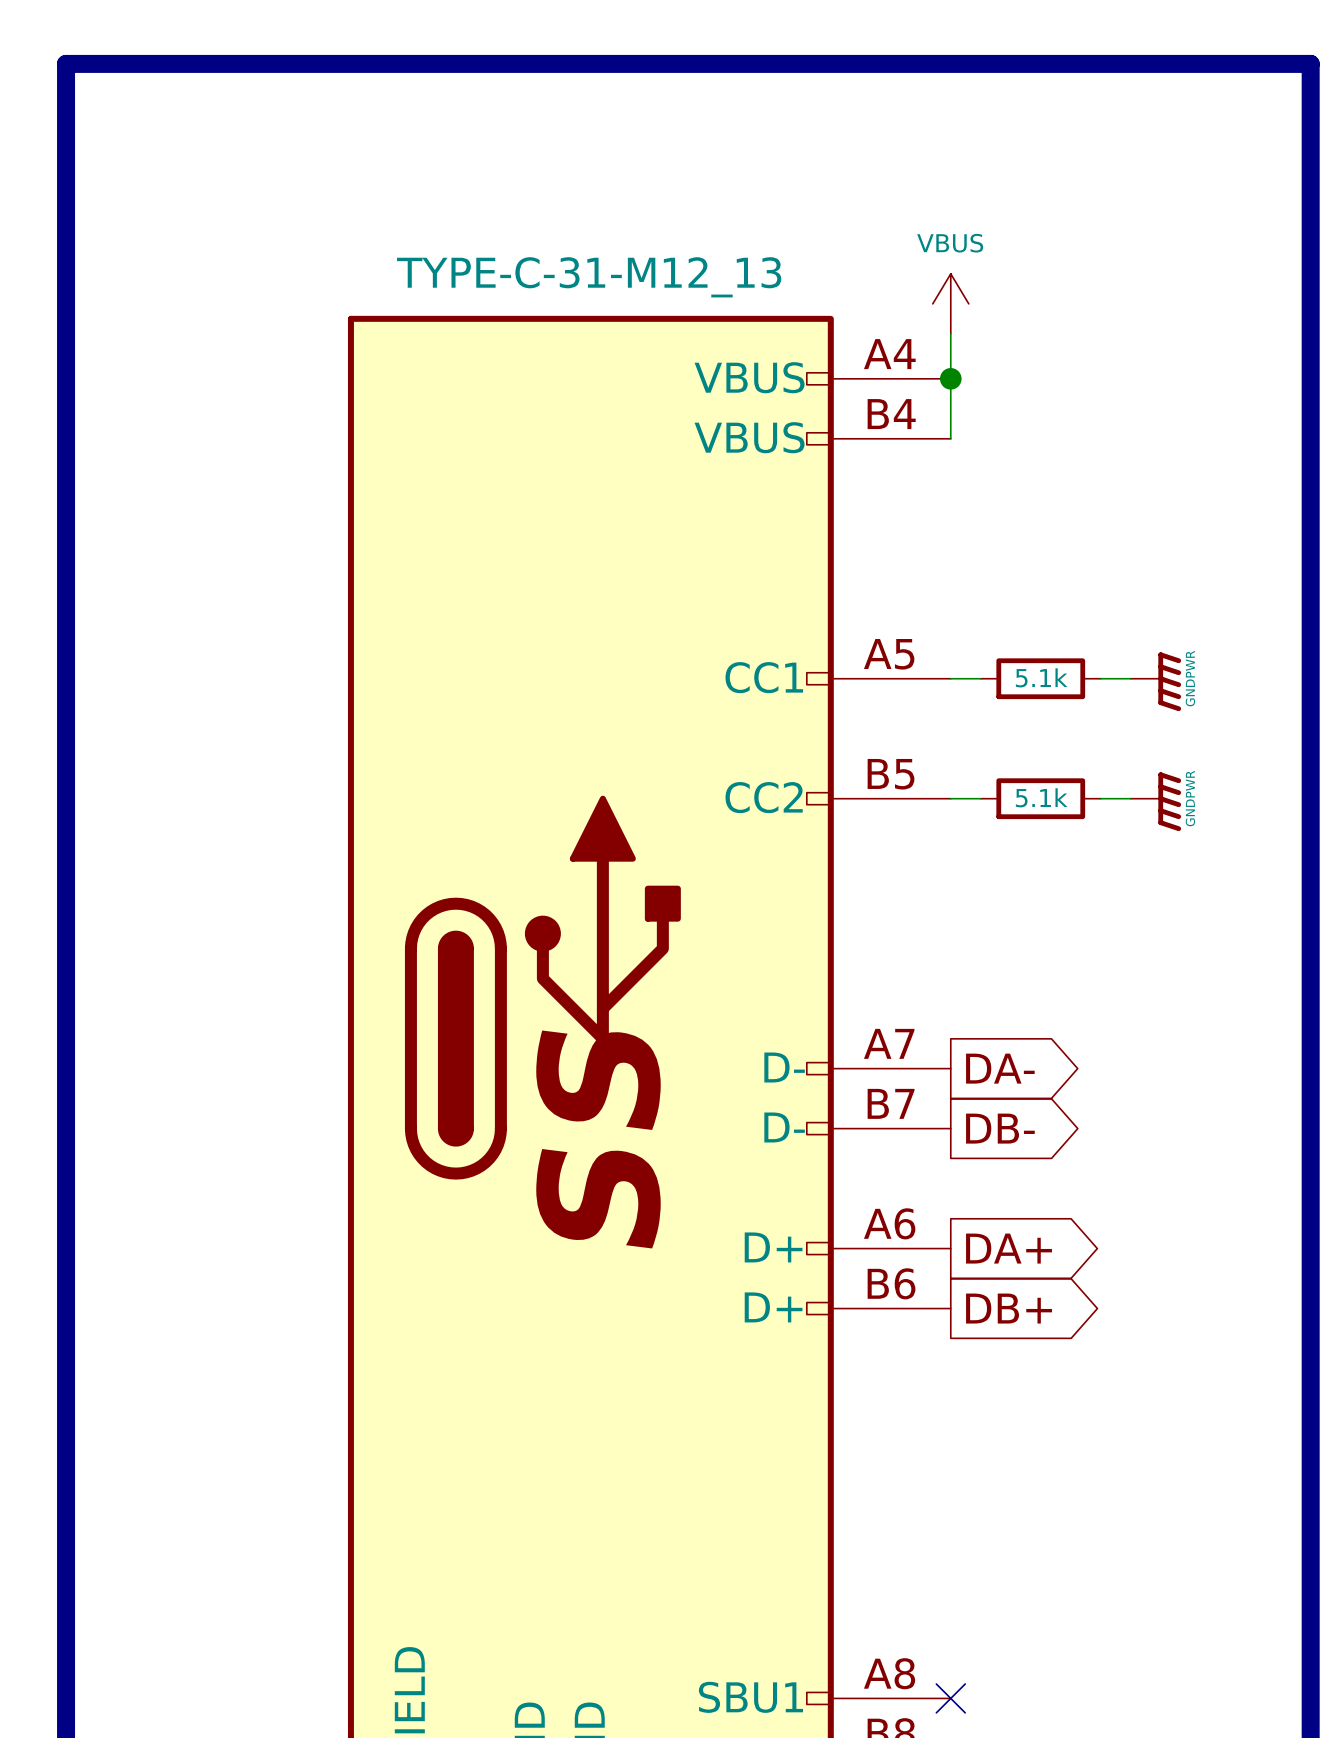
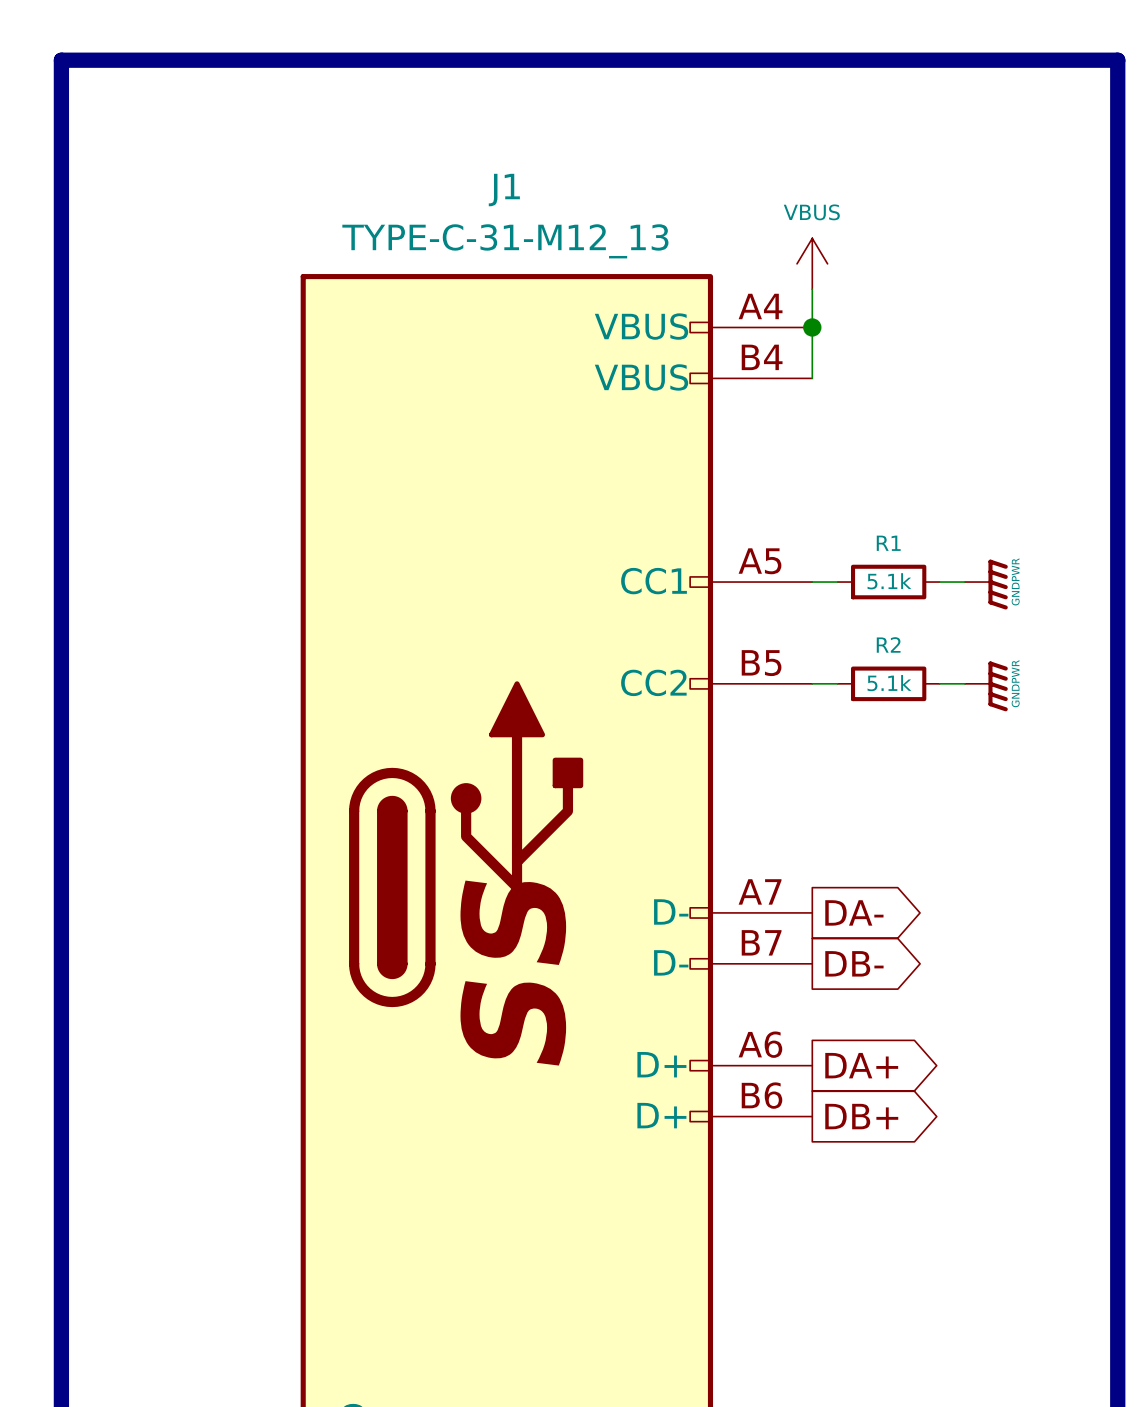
J1 name: none -> J1 (504, 190)
R1 name: none -> R1 (888, 543)
R2 name: none -> R2 (888, 644)

